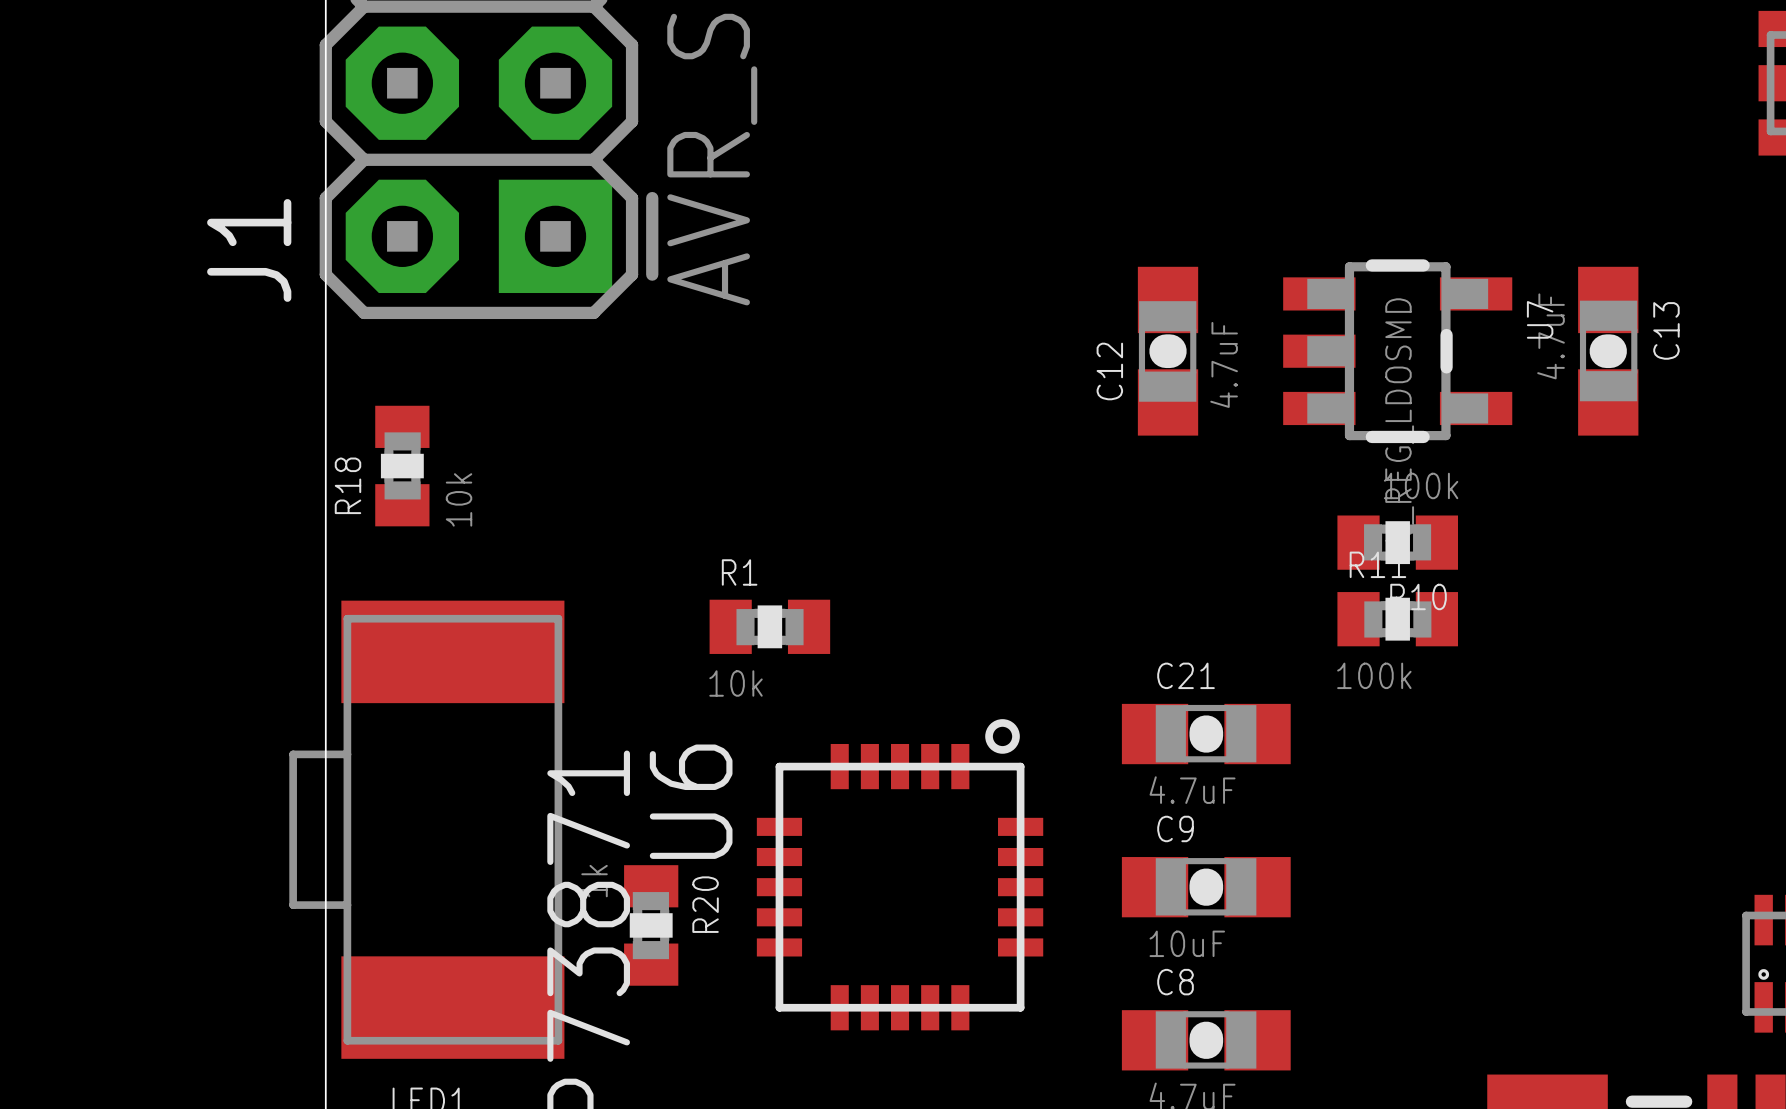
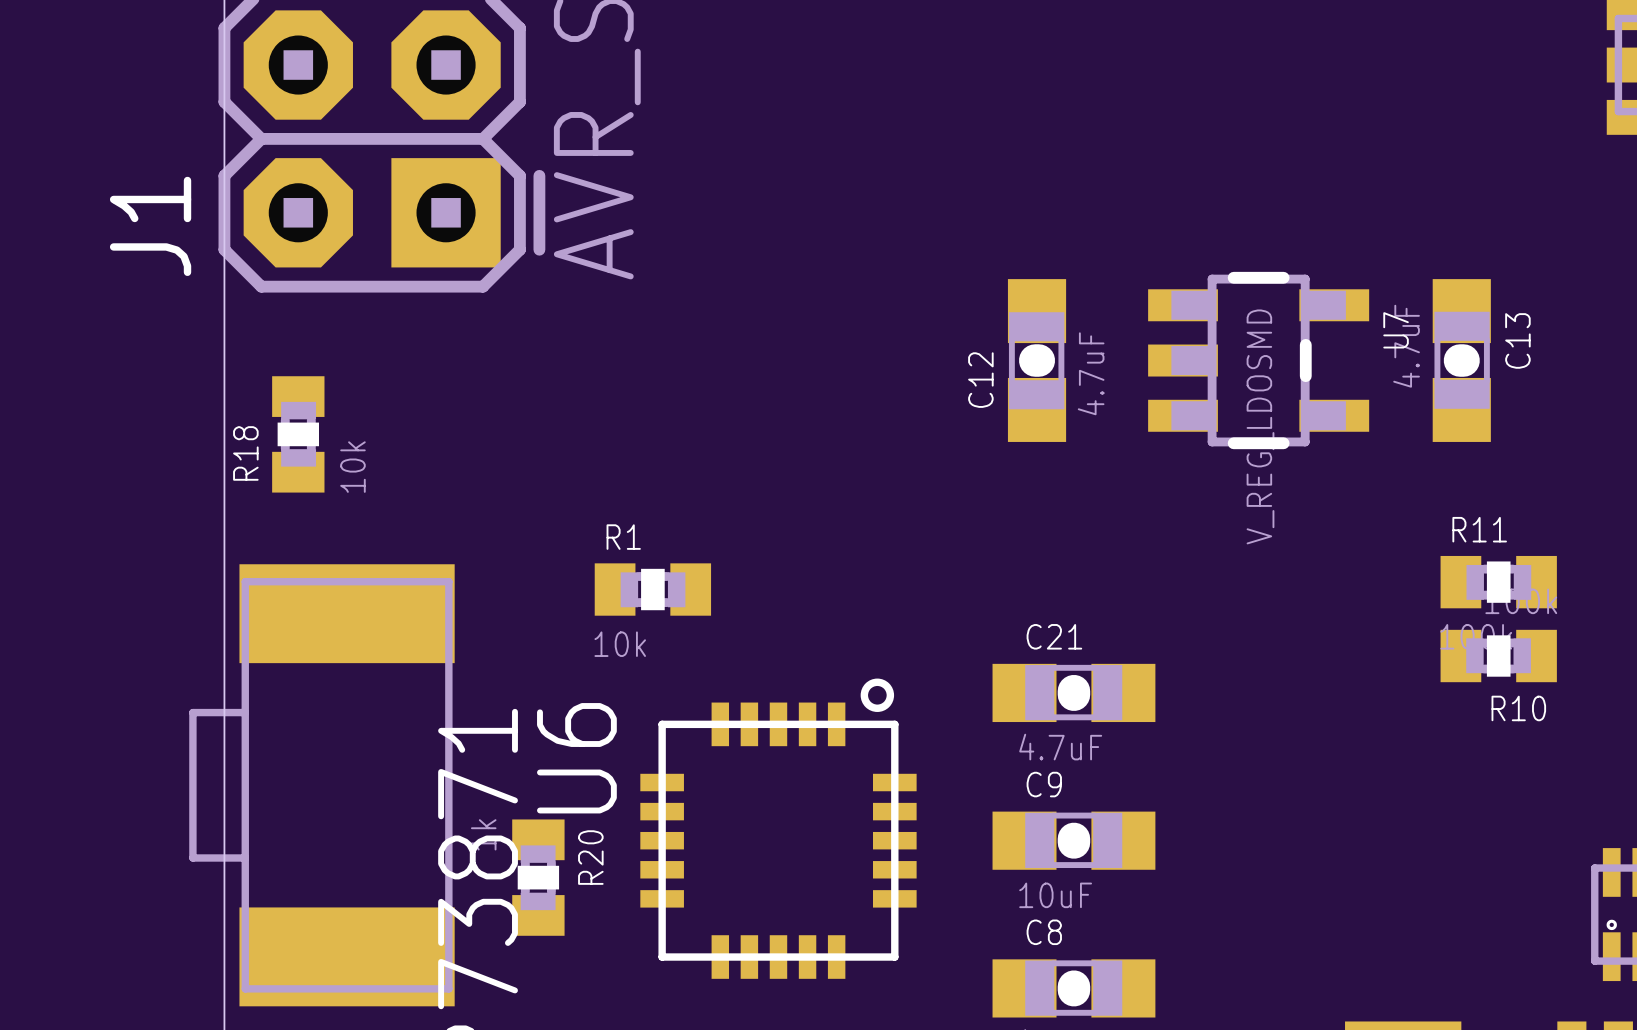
C12 position: (1168, 351) -> (1037, 360)
U7 position: (1397, 351) -> (1258, 360)
C13 position: (1608, 351) -> (1461, 360)
R10 position: (1397, 542) -> (1498, 656)
R11 position: (1397, 619) -> (1498, 582)

